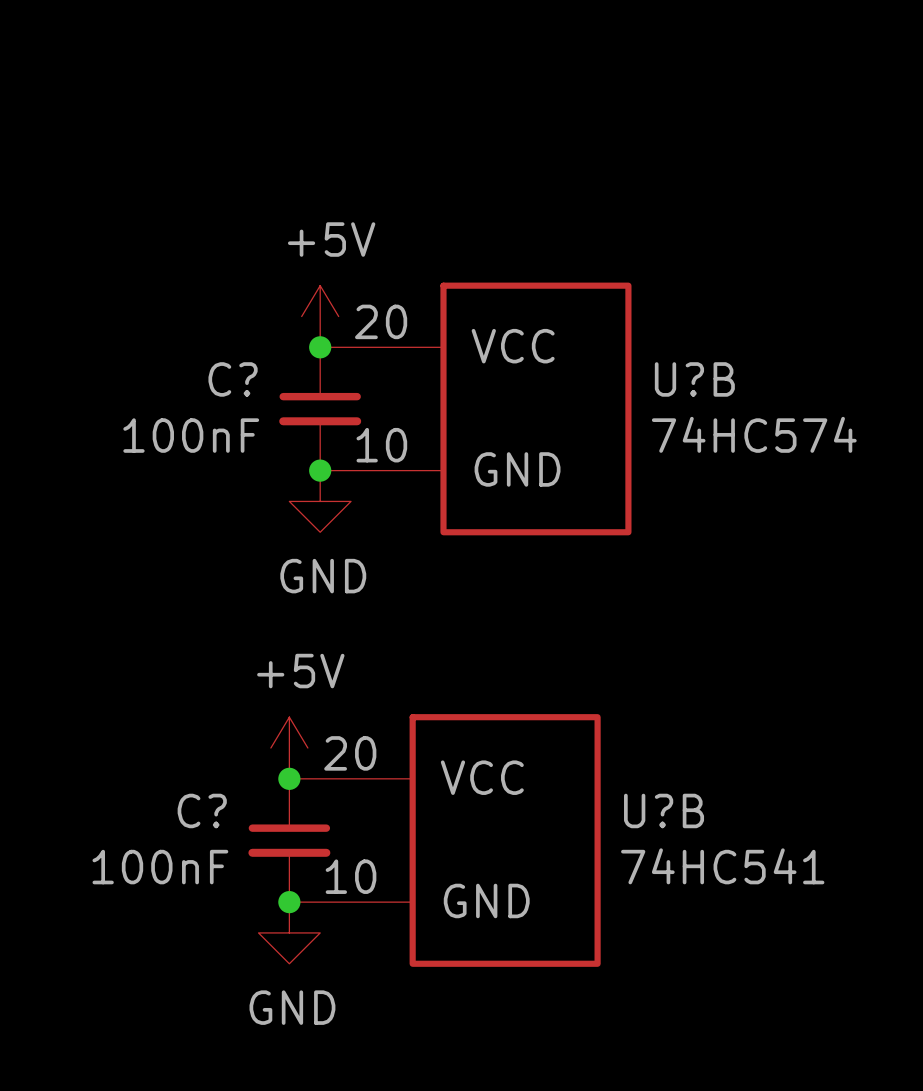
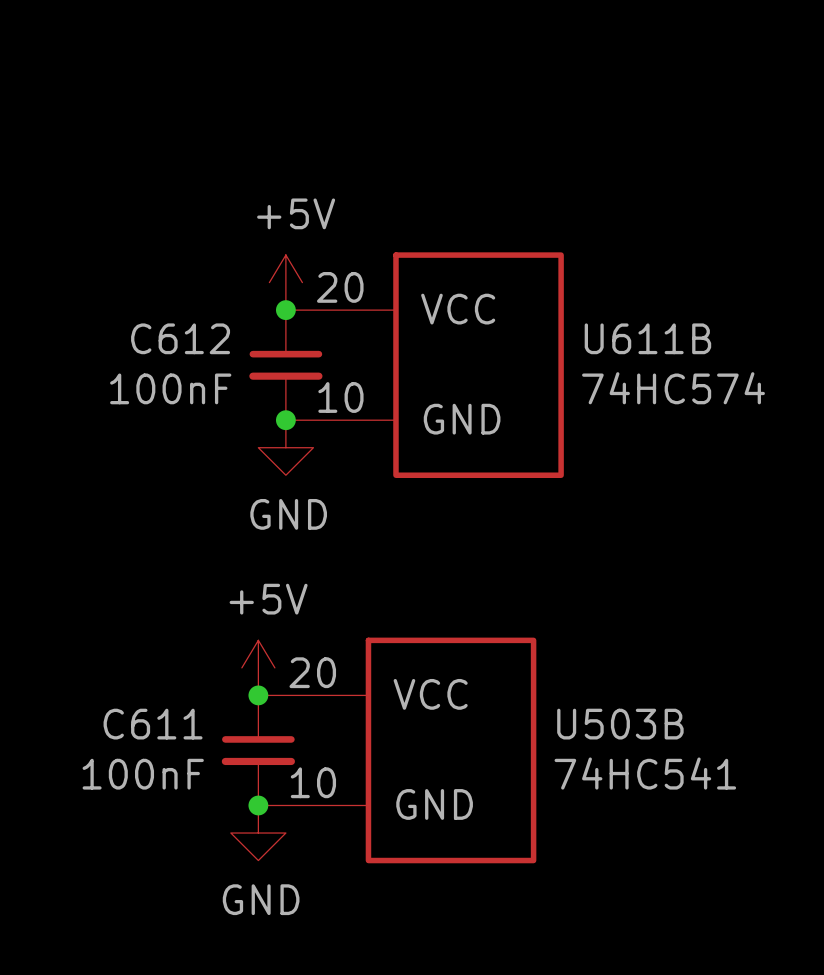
C? name: C? (233, 379) -> C612 (180, 338)
U?B name: U?B (694, 379) -> U611B (647, 338)
C? name: C? (202, 810) -> C611 (153, 724)
U?B name: U?B (664, 810) -> U503B (620, 724)

